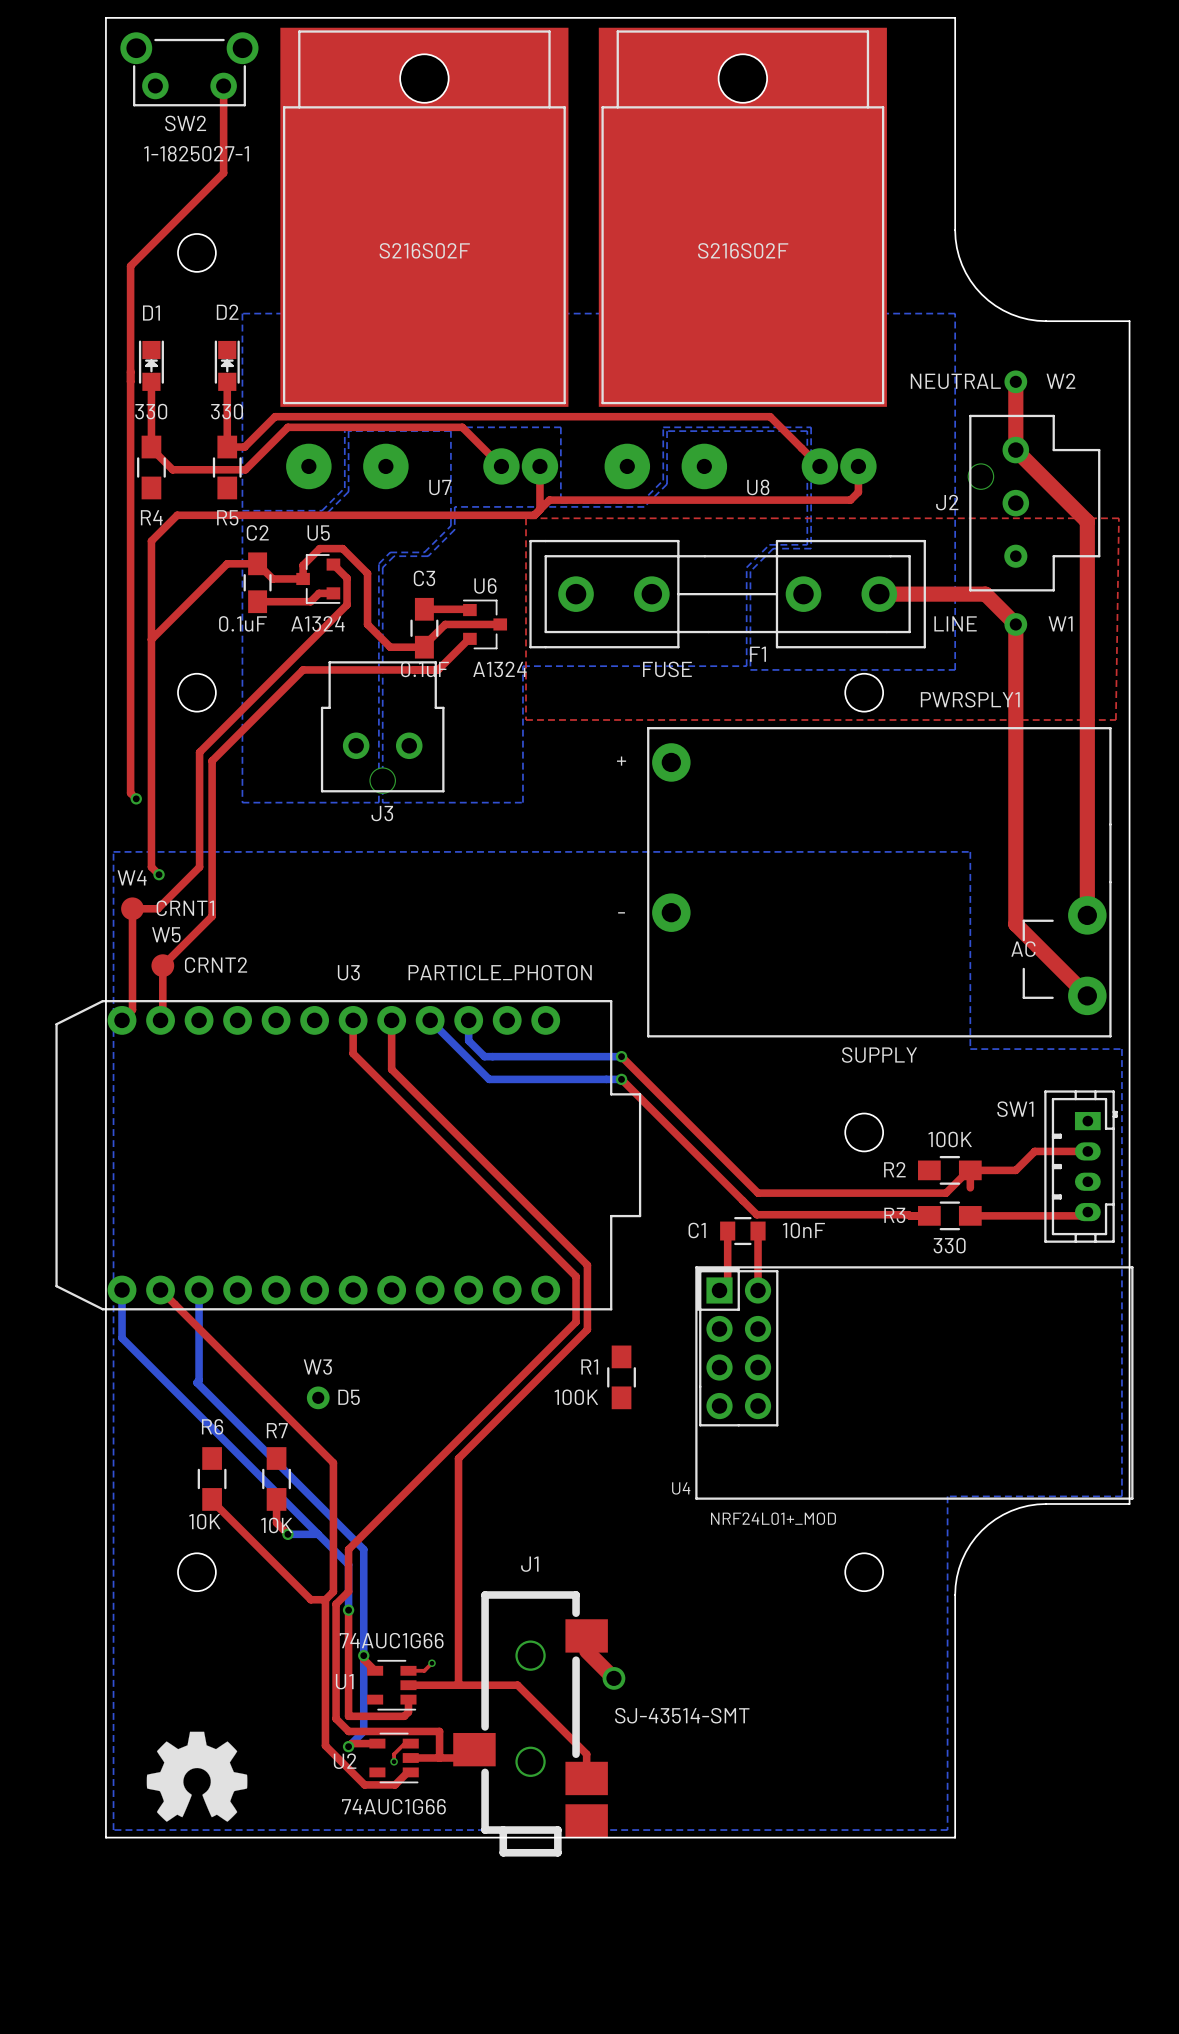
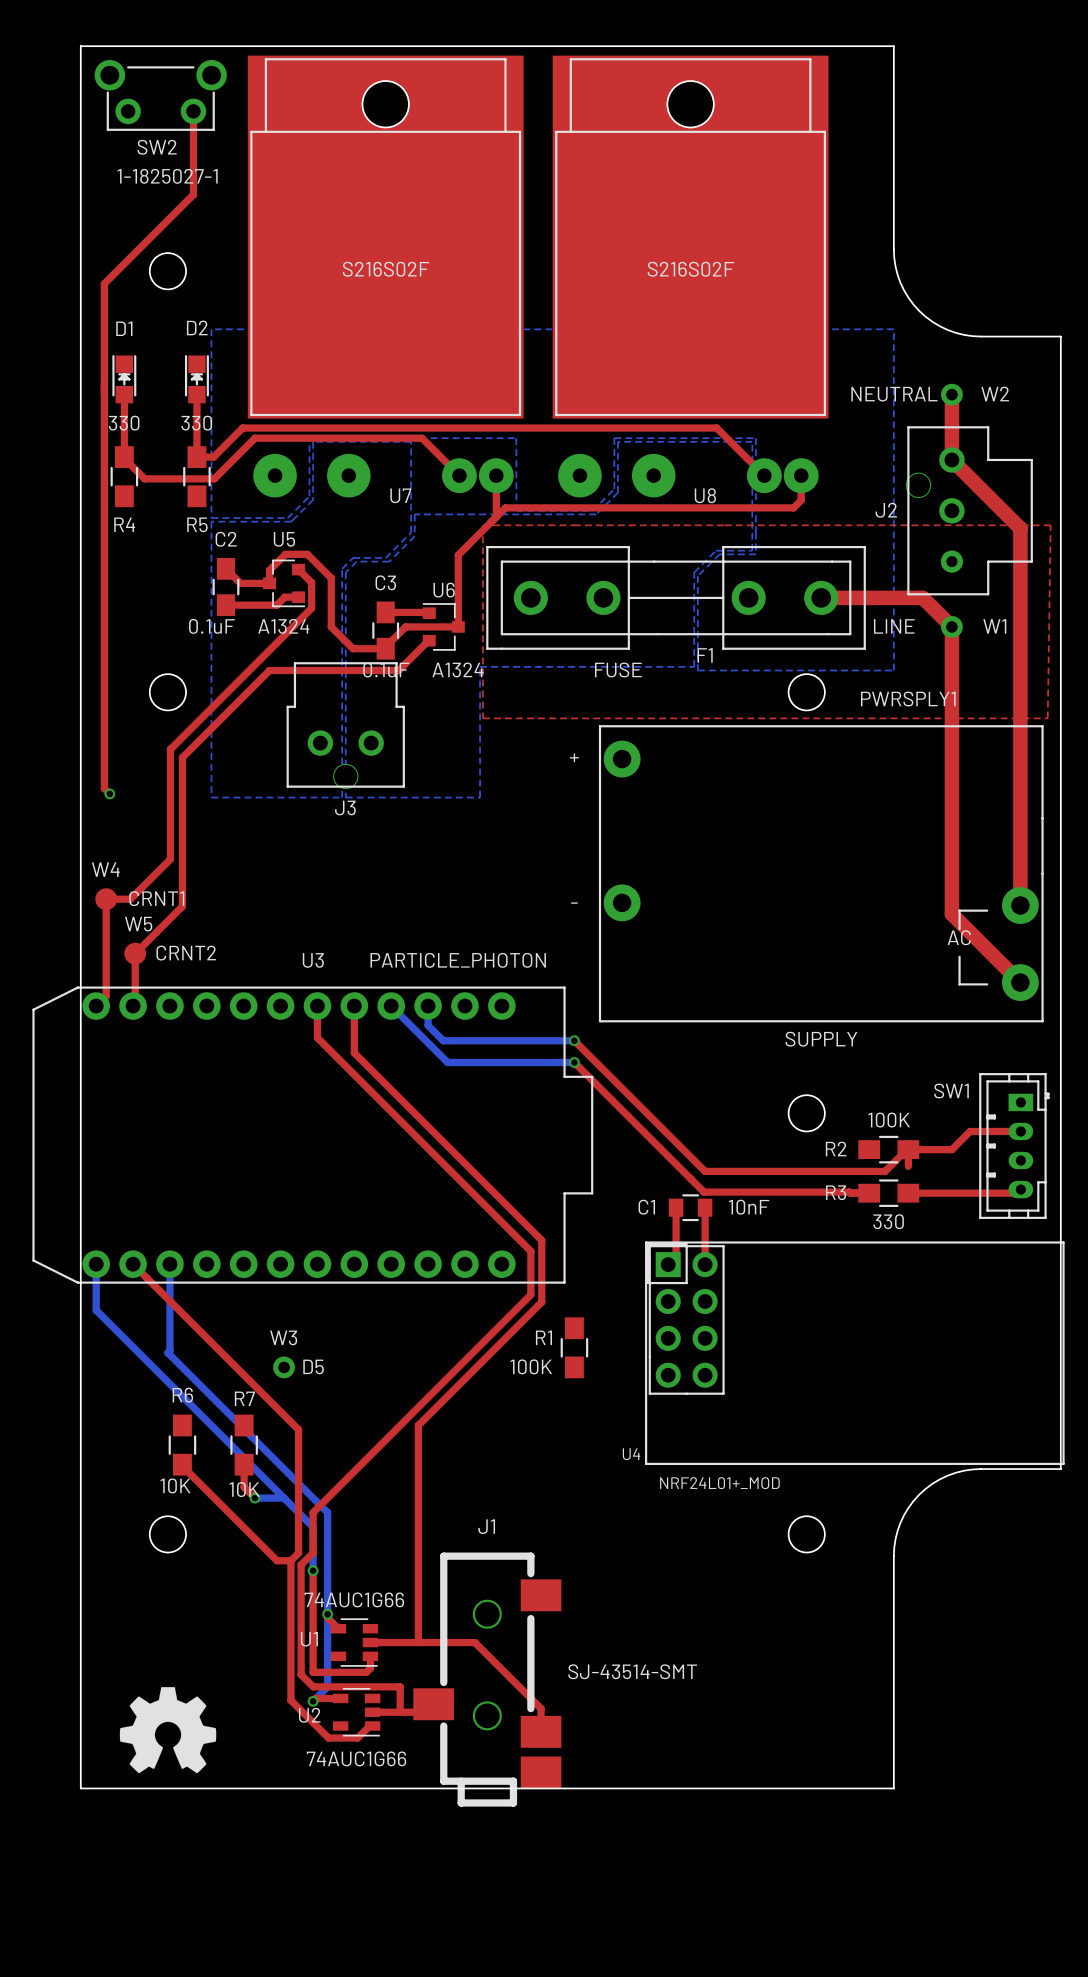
top track: (534, 515) (177, 515) (151, 541) (151, 867) (159, 874) -> (490, 522) (458, 555) (458, 626)
top track: (257, 563) (227, 563) (151, 639) -> none
bottom zone outline: (113, 851) (113, 1830) (947, 1830) (947, 1496) (1121, 1496) (1121, 1049) (970, 1049) (970, 851) (113, 851) -> none
via: (159, 874) -> none
top track: (586, 1635) (586, 1651) (613, 1678) -> none
top track: (431, 1663) (424, 1670) (408, 1670) -> none
via: (431, 1663) -> none
via: (613, 1678) -> none
top track: (410, 1743) (404, 1743) (394, 1754) (394, 1761) -> none
via: (394, 1761) -> none

